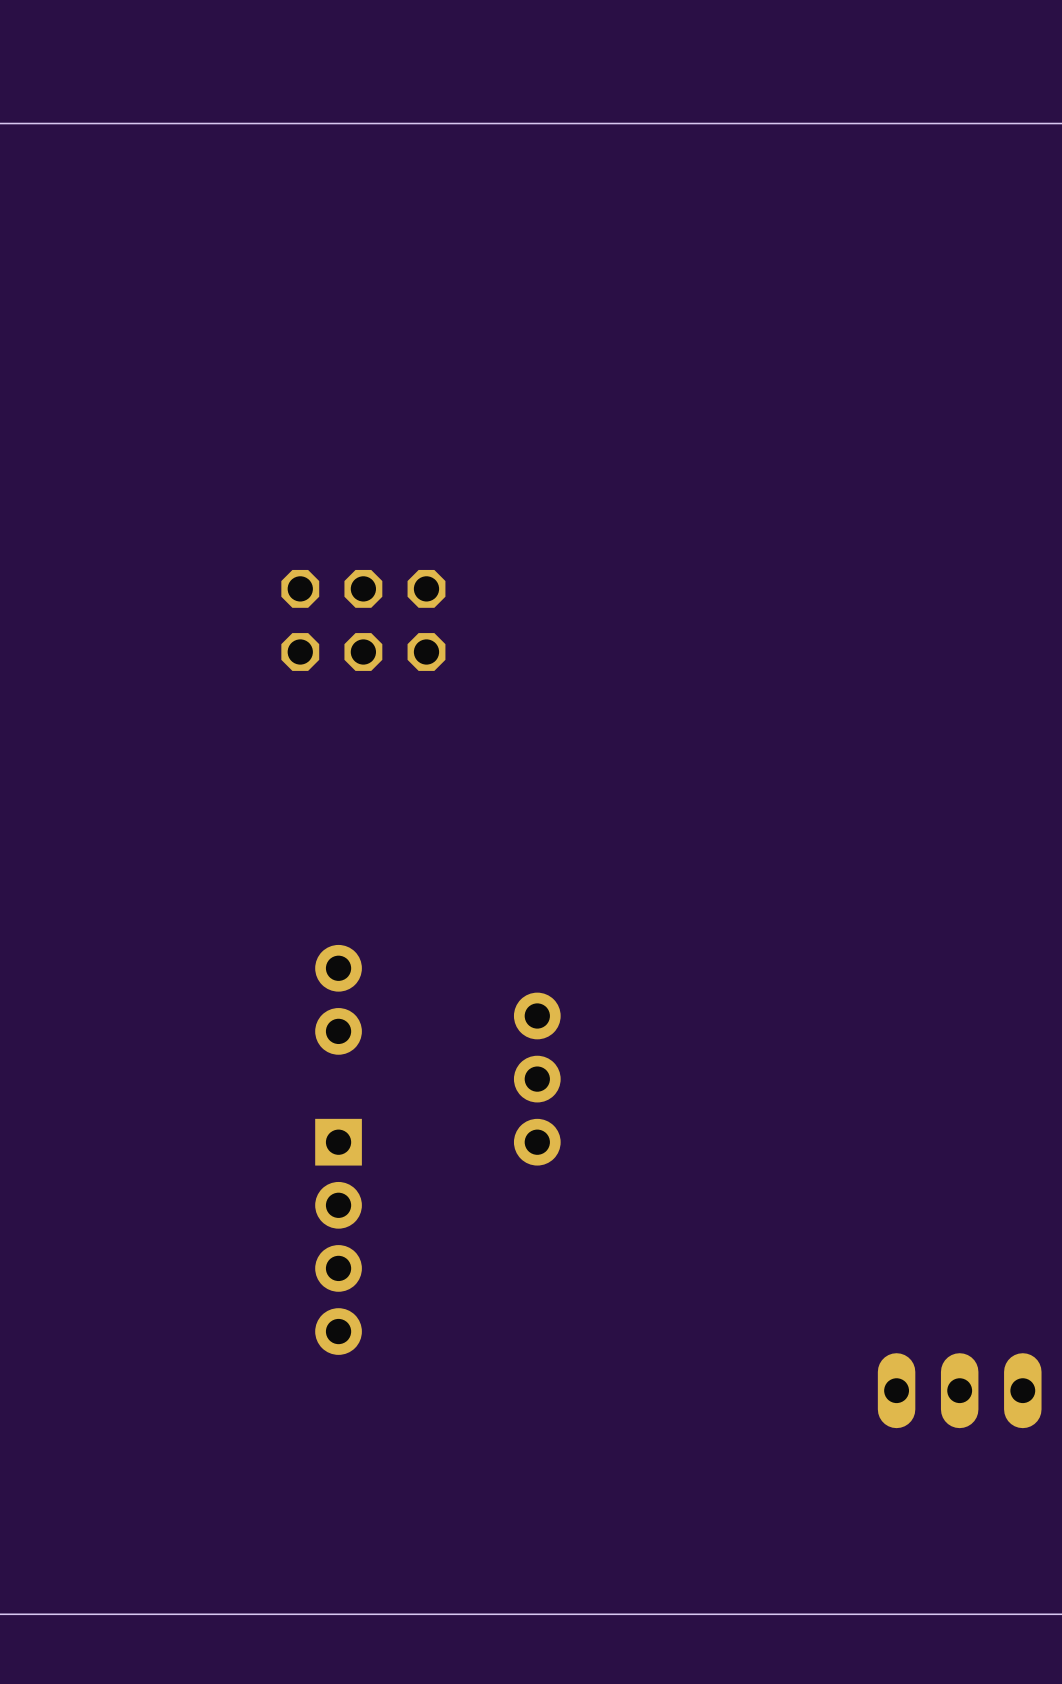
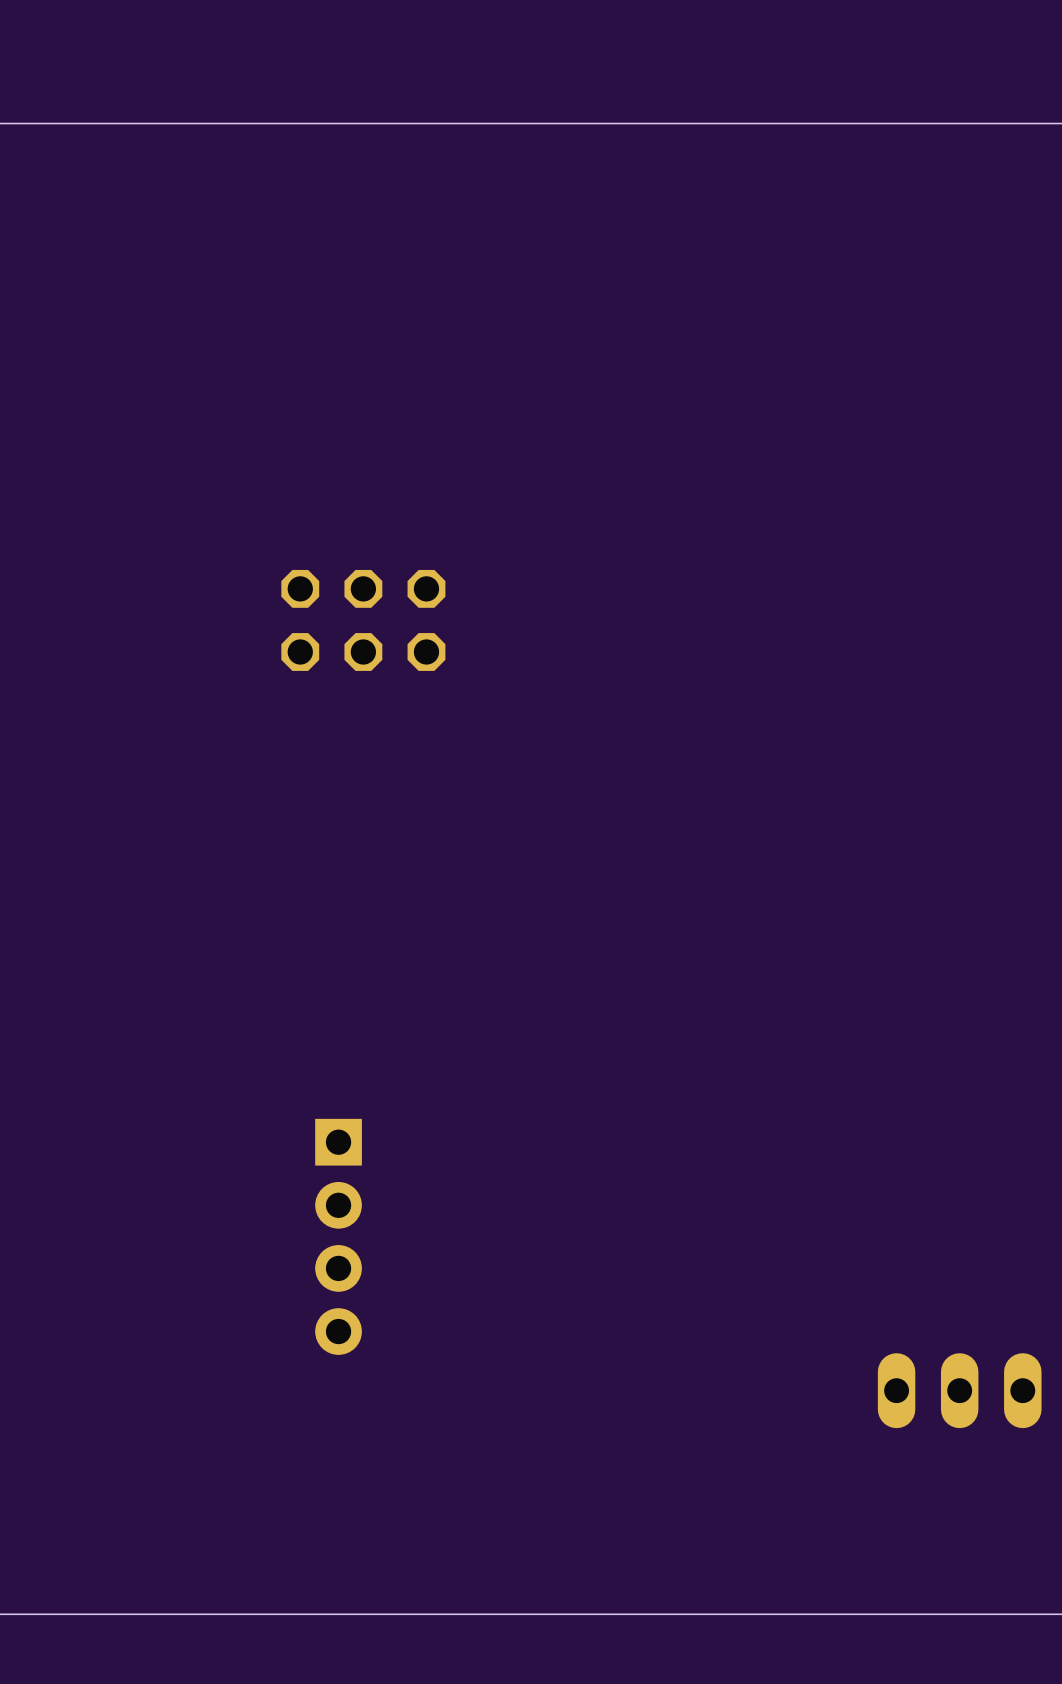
part: (338, 999) -> none
part: (537, 1079) -> none

